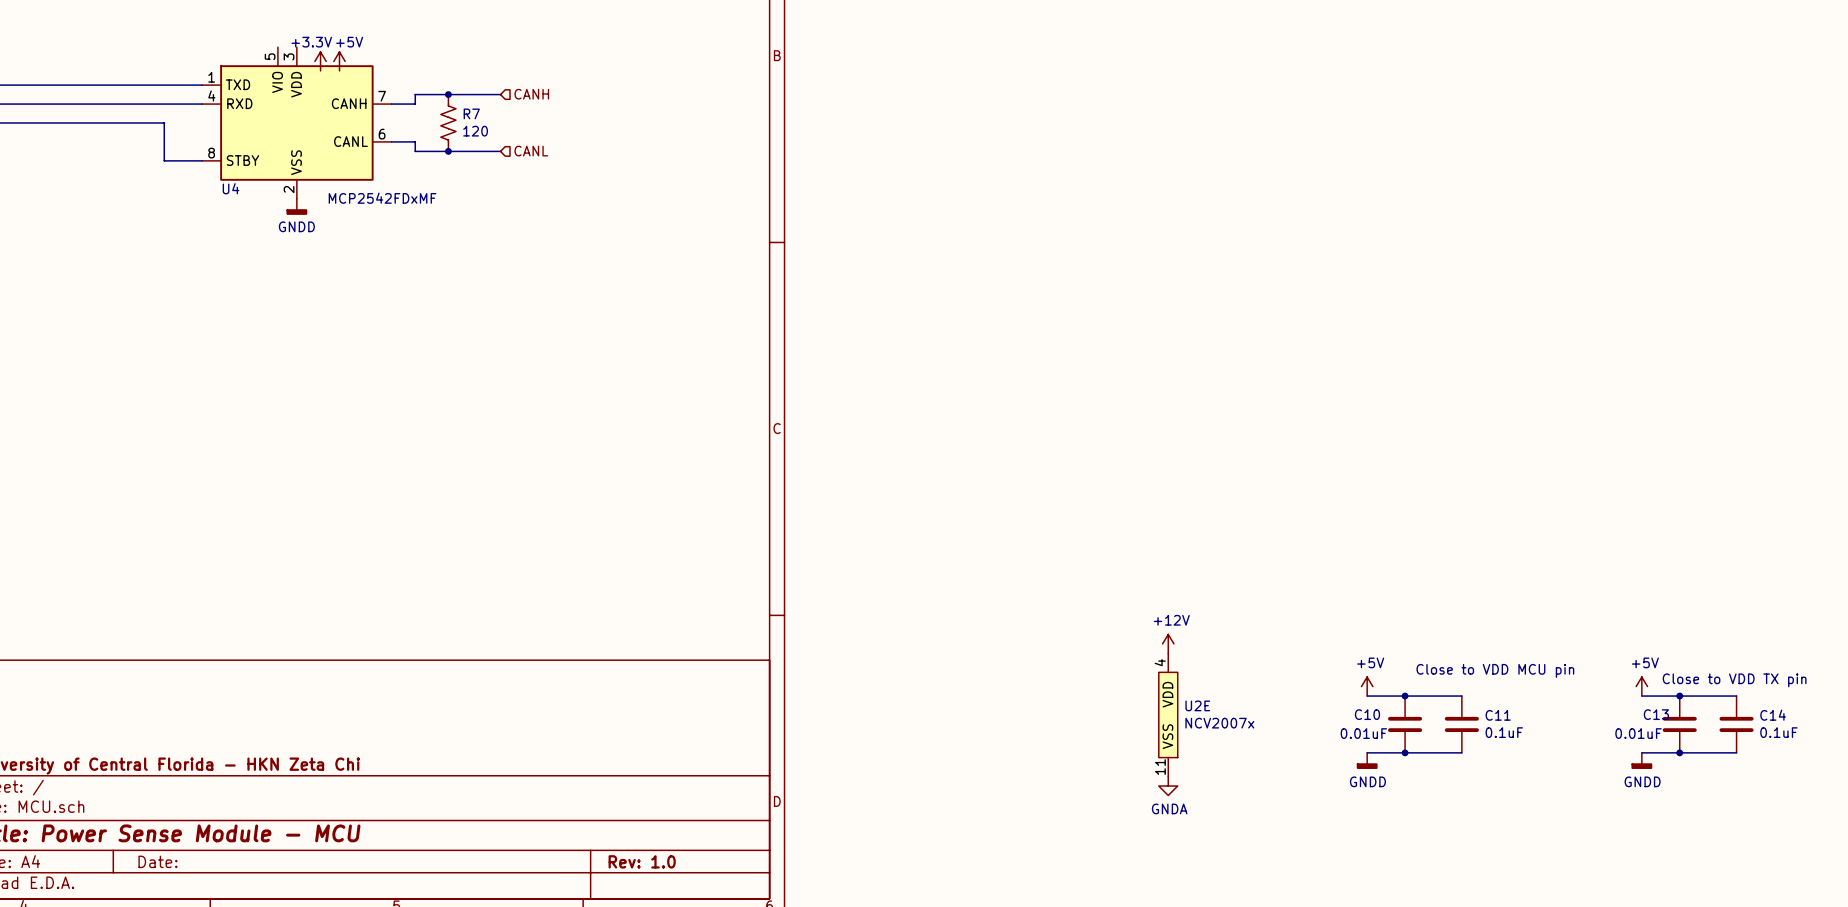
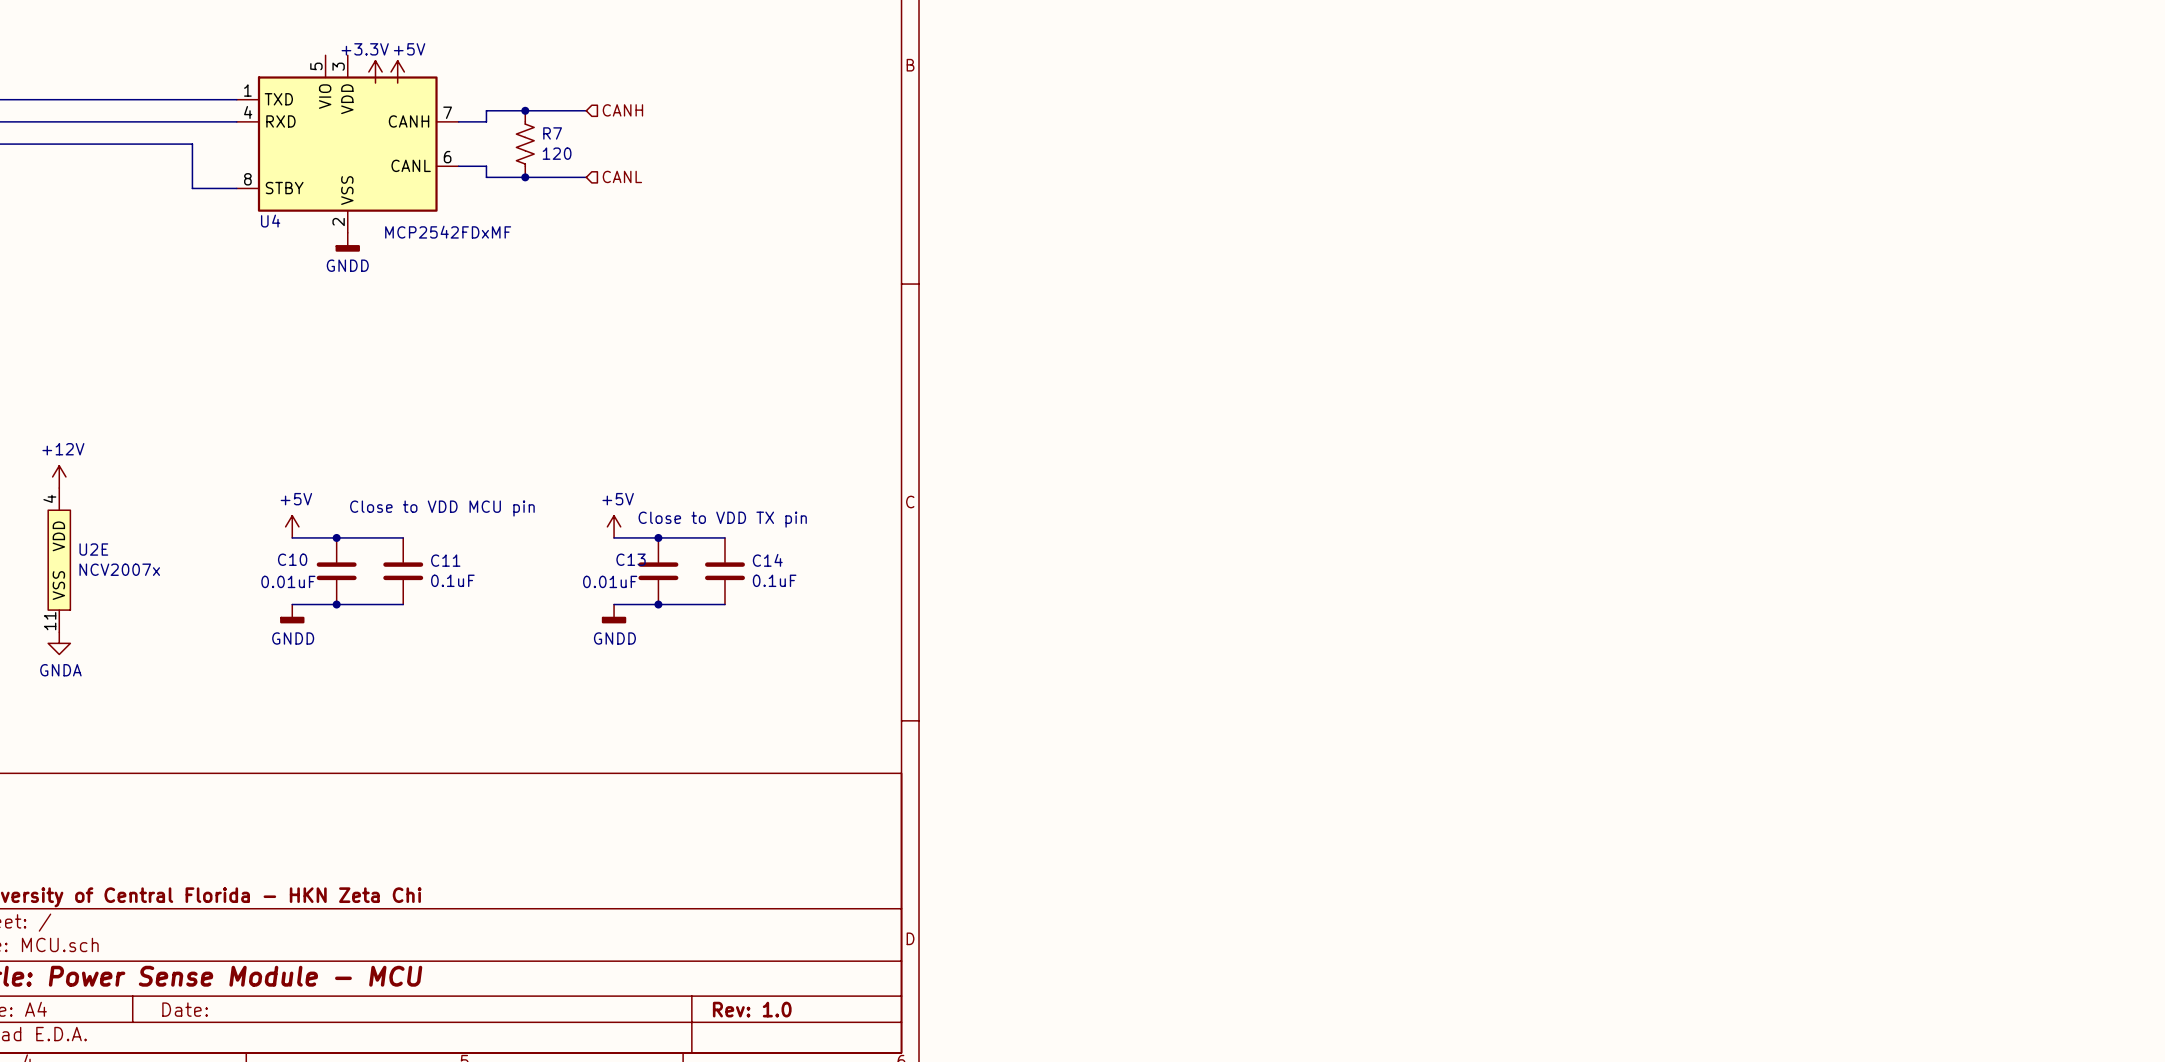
power symbol: none -> +12V (59, 476)
text: none -> Close to VDD MCU pin (442, 508)
text: none -> Close to VDD TX pin (722, 519)
power symbol: none -> +5V (292, 526)
power symbol: none -> +5V (614, 526)
wire: none -> (292, 537) (403, 537)
junction: none -> (336, 537)
wire: none -> (614, 537) (724, 537)
junction: none -> (658, 537)
wire: none -> (292, 604) (403, 604)
junction: none -> (336, 604)
wire: none -> (614, 604) (724, 604)
junction: none -> (658, 604)
power symbol: none -> GNDD (292, 613)
power symbol: none -> GNDD (614, 613)
power symbol: none -> GNDA (59, 643)
power symbol: +12V (1168, 643) -> none
text: Close to VDD MCU pin (1495, 670) -> none
text: Close to VDD TX pin (1734, 680) -> none
power symbol: +5V (1367, 686) -> none
power symbol: +5V (1641, 686) -> none
wire: (1367, 696) (1461, 696) -> none
junction: (1405, 696) -> none
wire: (1641, 696) (1736, 696) -> none
junction: (1679, 696) -> none
U2E position: (1168, 714) -> (59, 560)
C10 position: (1405, 724) -> (336, 571)
C11 position: (1461, 724) -> (403, 571)
C13 position: (1679, 724) -> (658, 571)
C14 position: (1736, 724) -> (724, 571)
wire: (1367, 752) (1461, 752) -> none
junction: (1405, 752) -> none
wire: (1641, 752) (1736, 752) -> none
junction: (1679, 752) -> none
power symbol: GNDD (1367, 760) -> none
power symbol: GNDD (1641, 760) -> none
power symbol: GNDA (1168, 786) -> none

